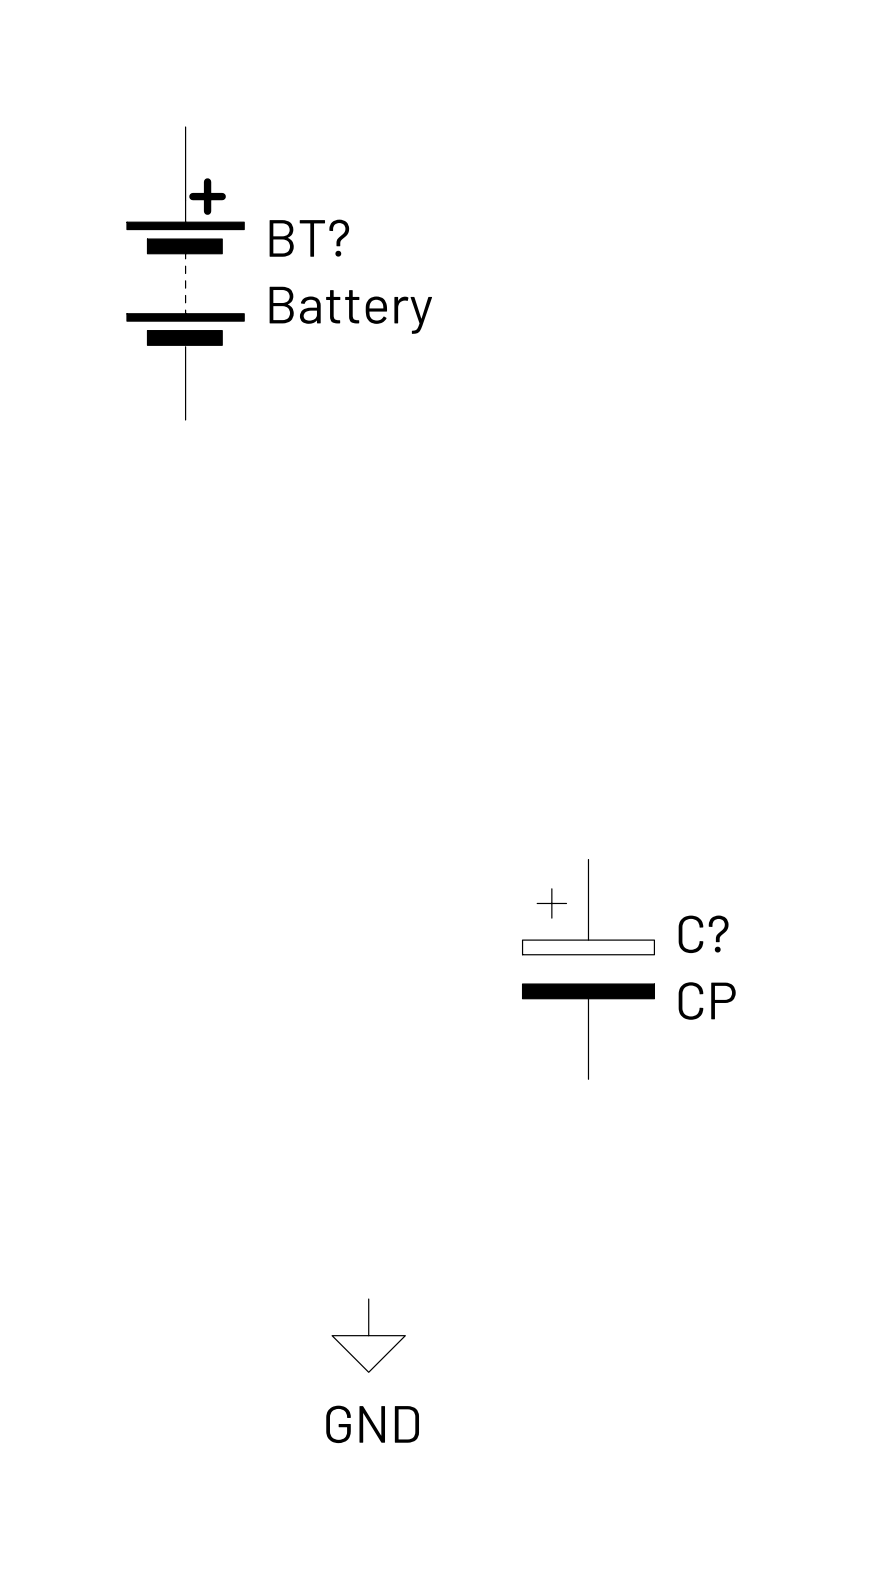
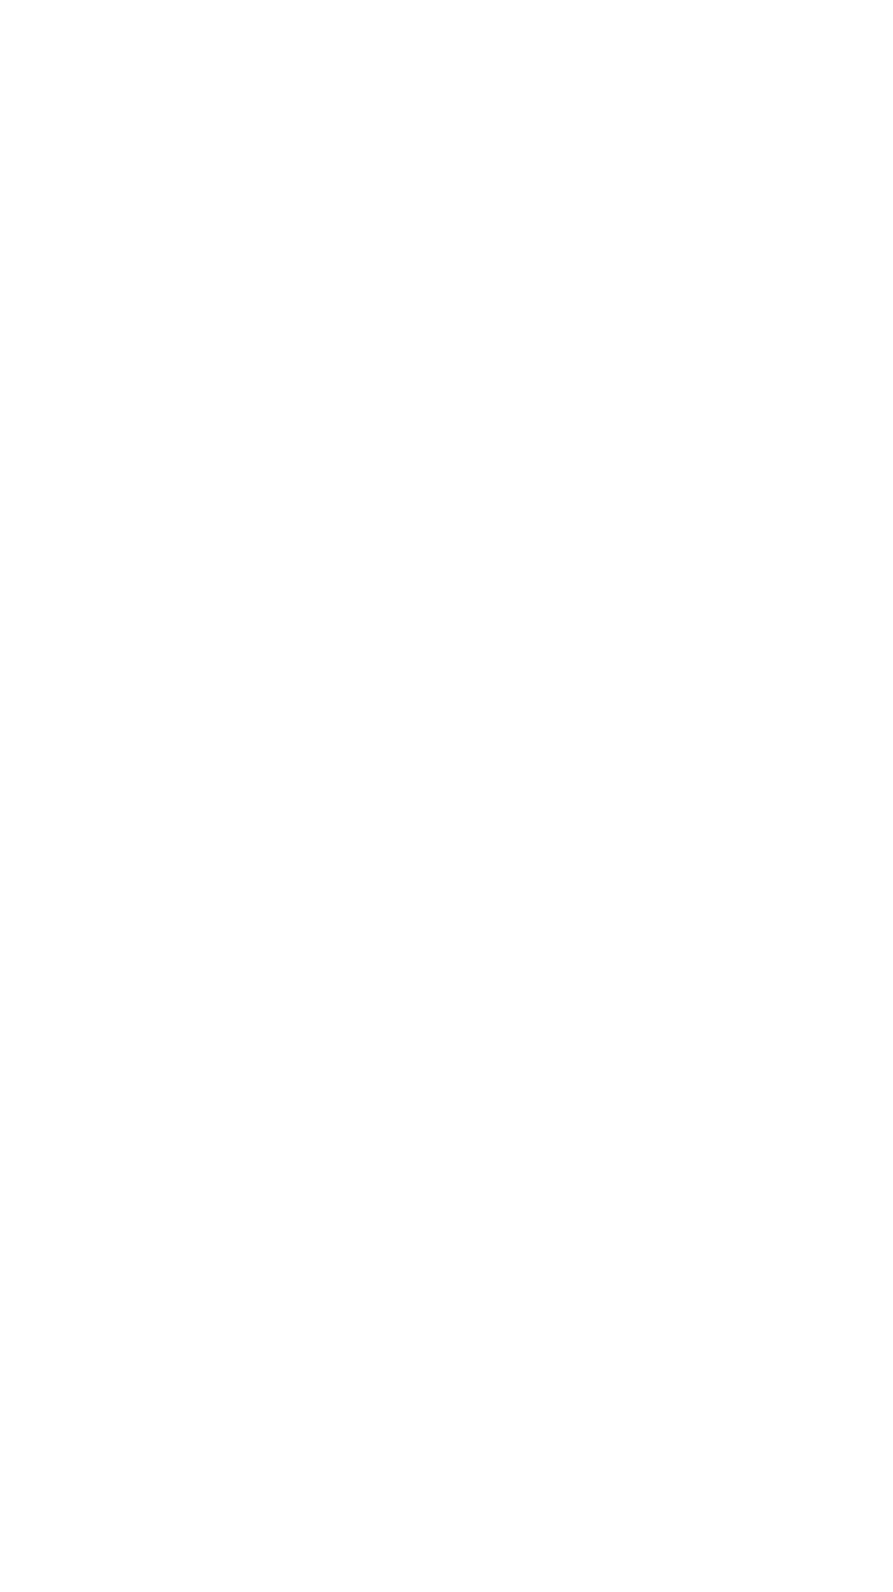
BT?: Battery (185, 273) -> none
C?: CP (588, 969) -> none
power symbol: GND (368, 1335) -> none

